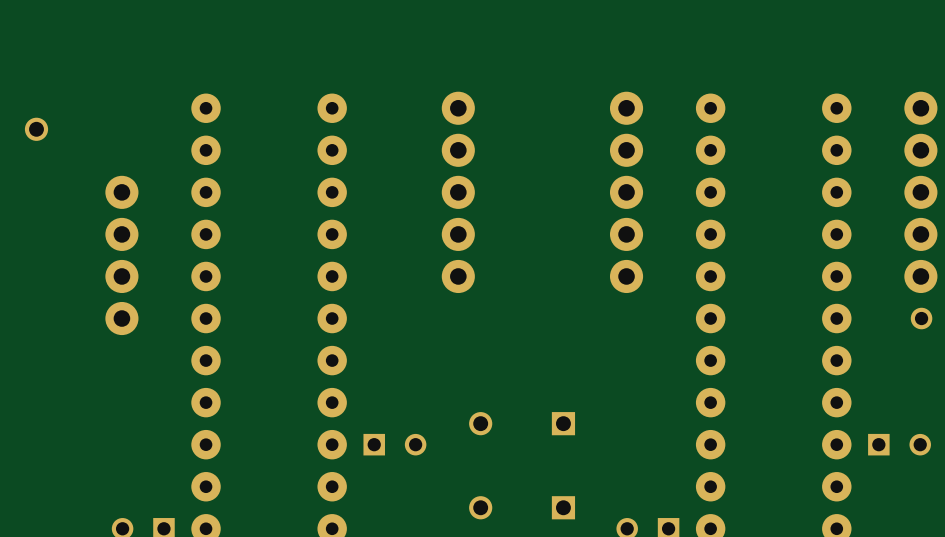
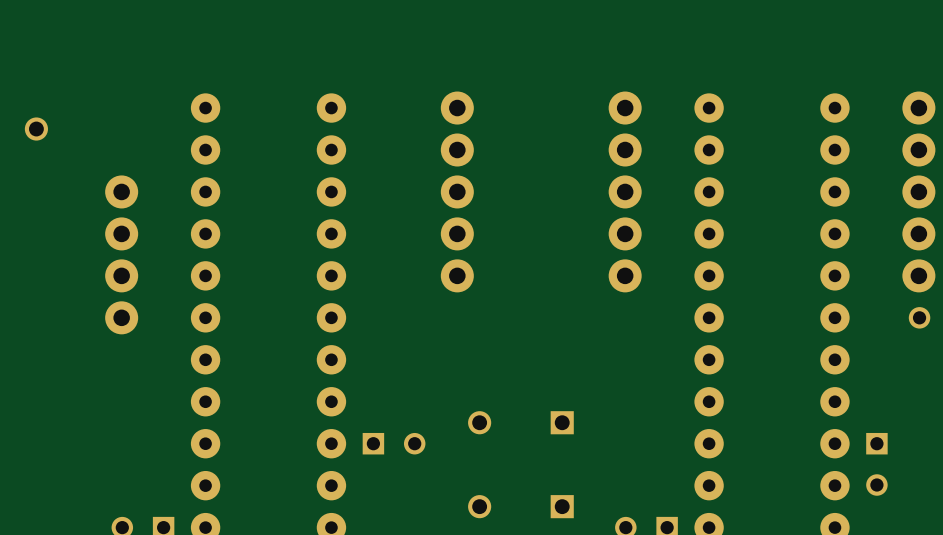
part rotation: 0° (899, 444) -> 90° clockwise (876, 464)

